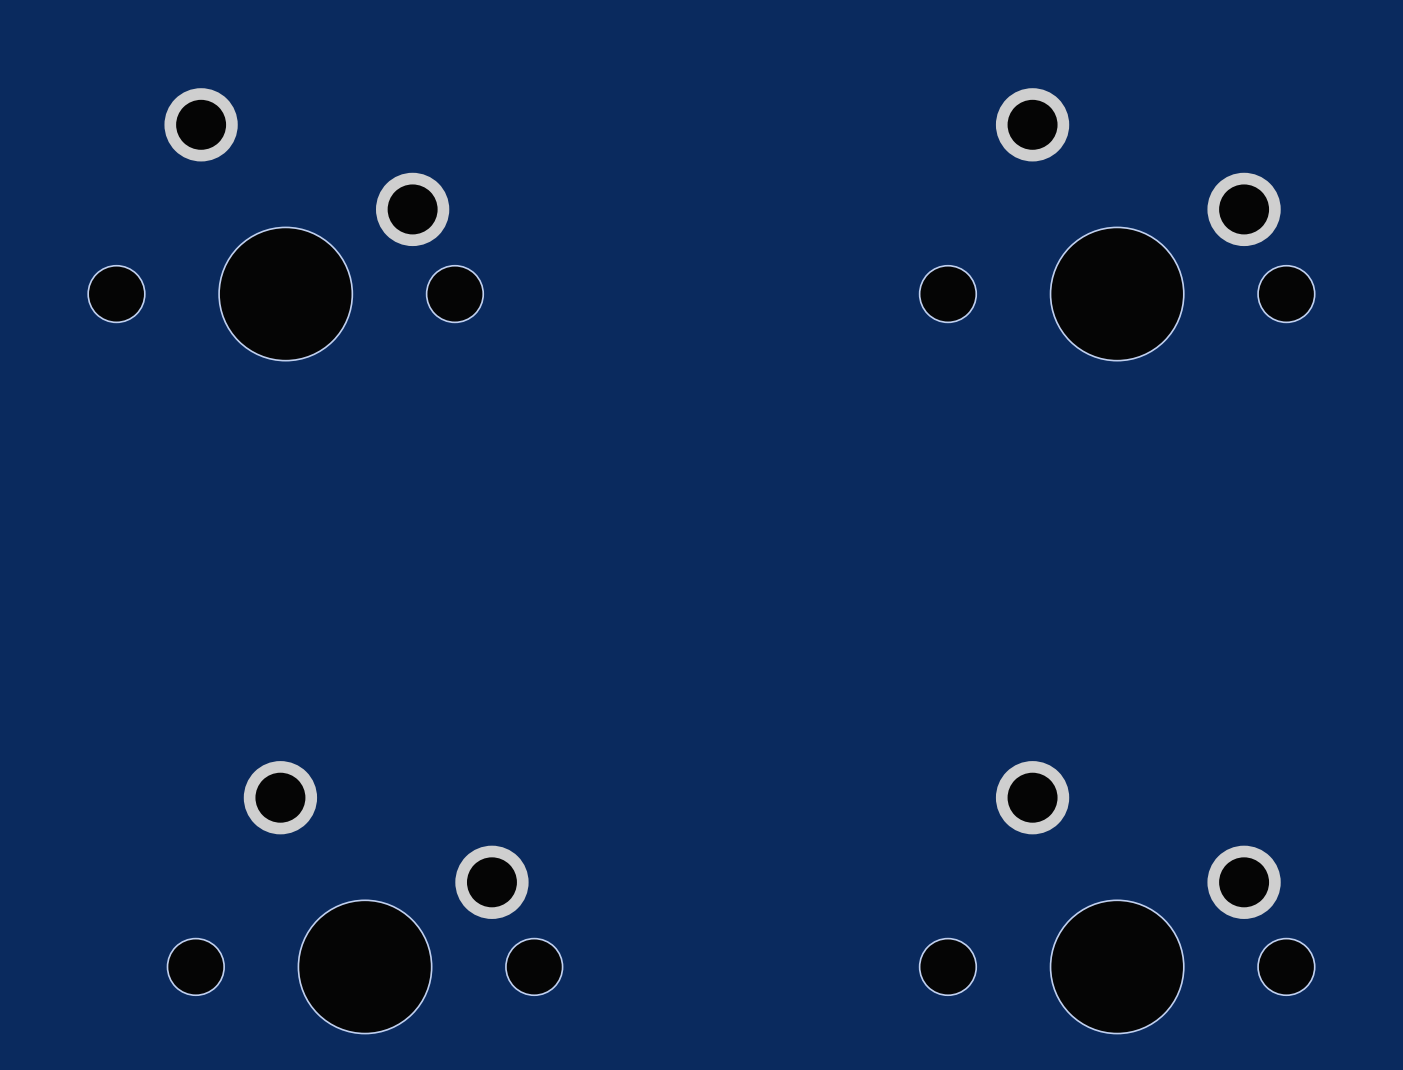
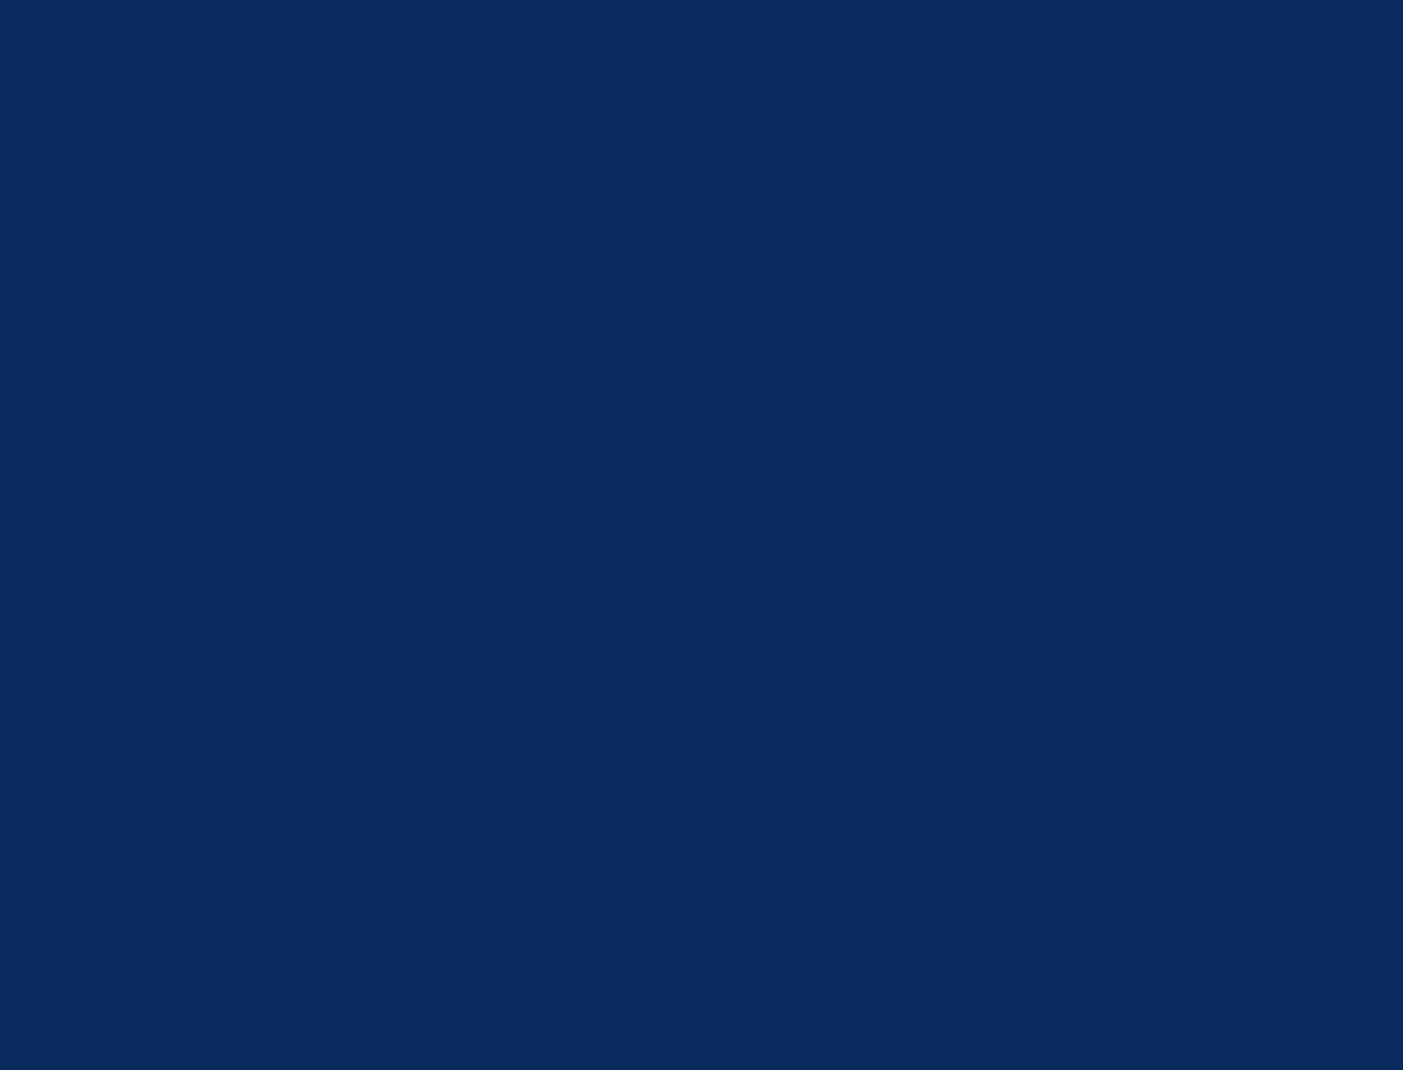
part: (285, 224) -> none
part: (1117, 224) -> none
part: (365, 897) -> none
part: (1117, 897) -> none

